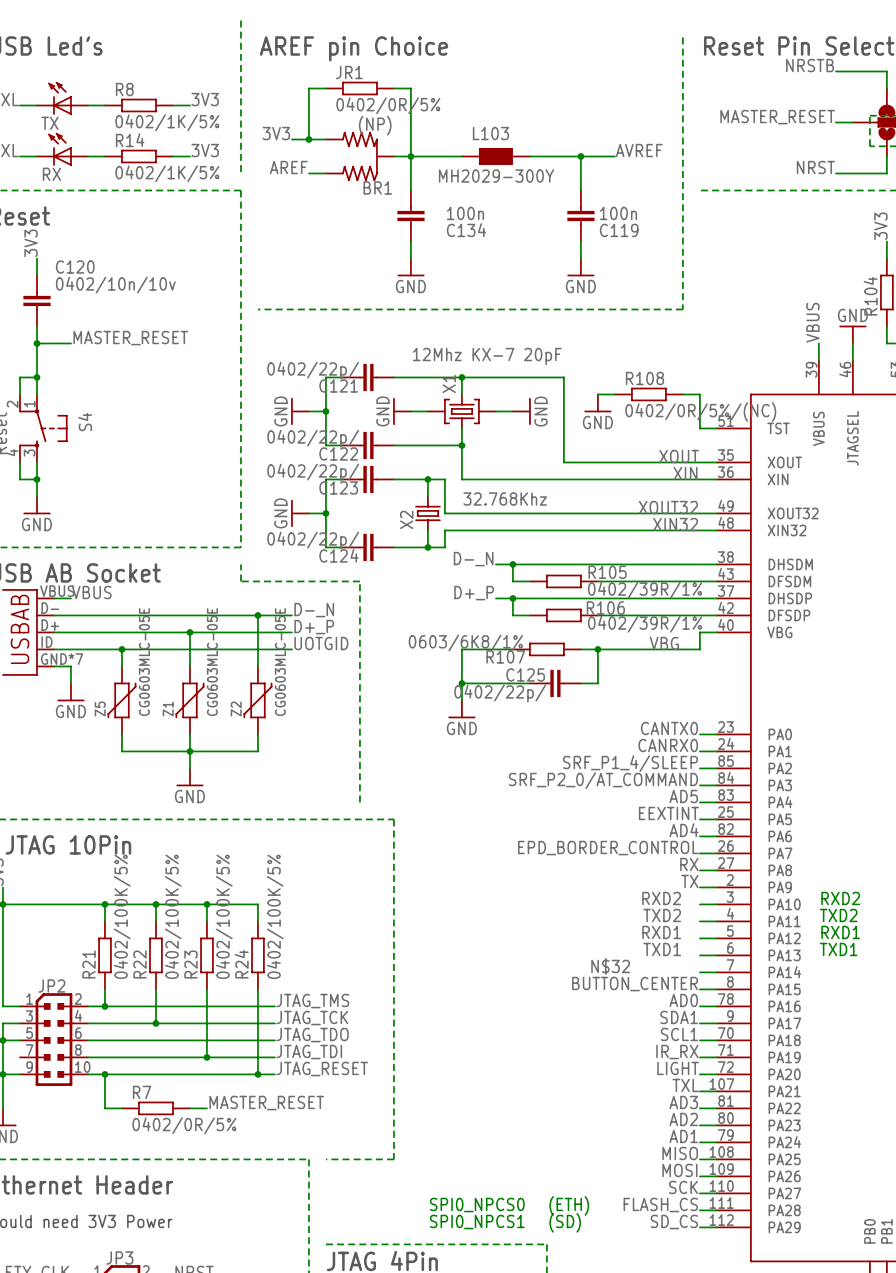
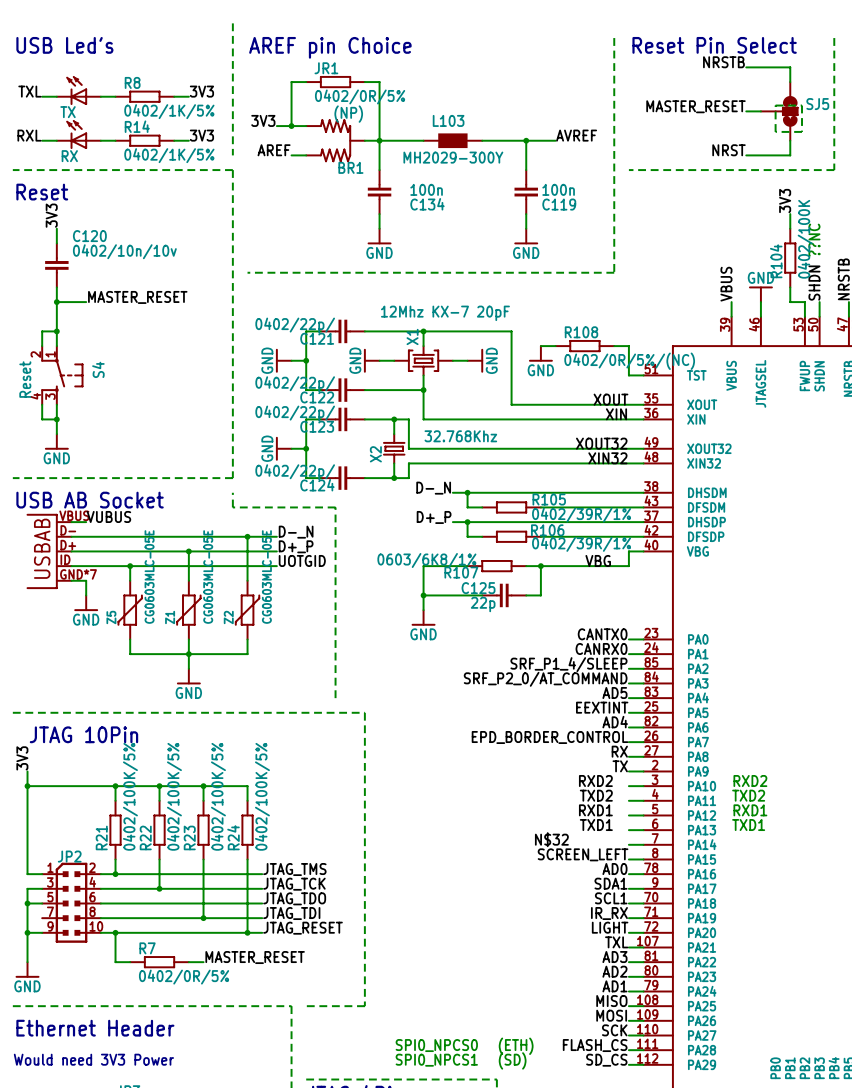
label: VBUS (91, 592) -> VUBUS (108, 516)
C125 value: 0402/22p/ (500, 693) -> 22p (483, 604)
label: BUTTON_CENTER (635, 984) -> SCREEN_LEFT (583, 854)

